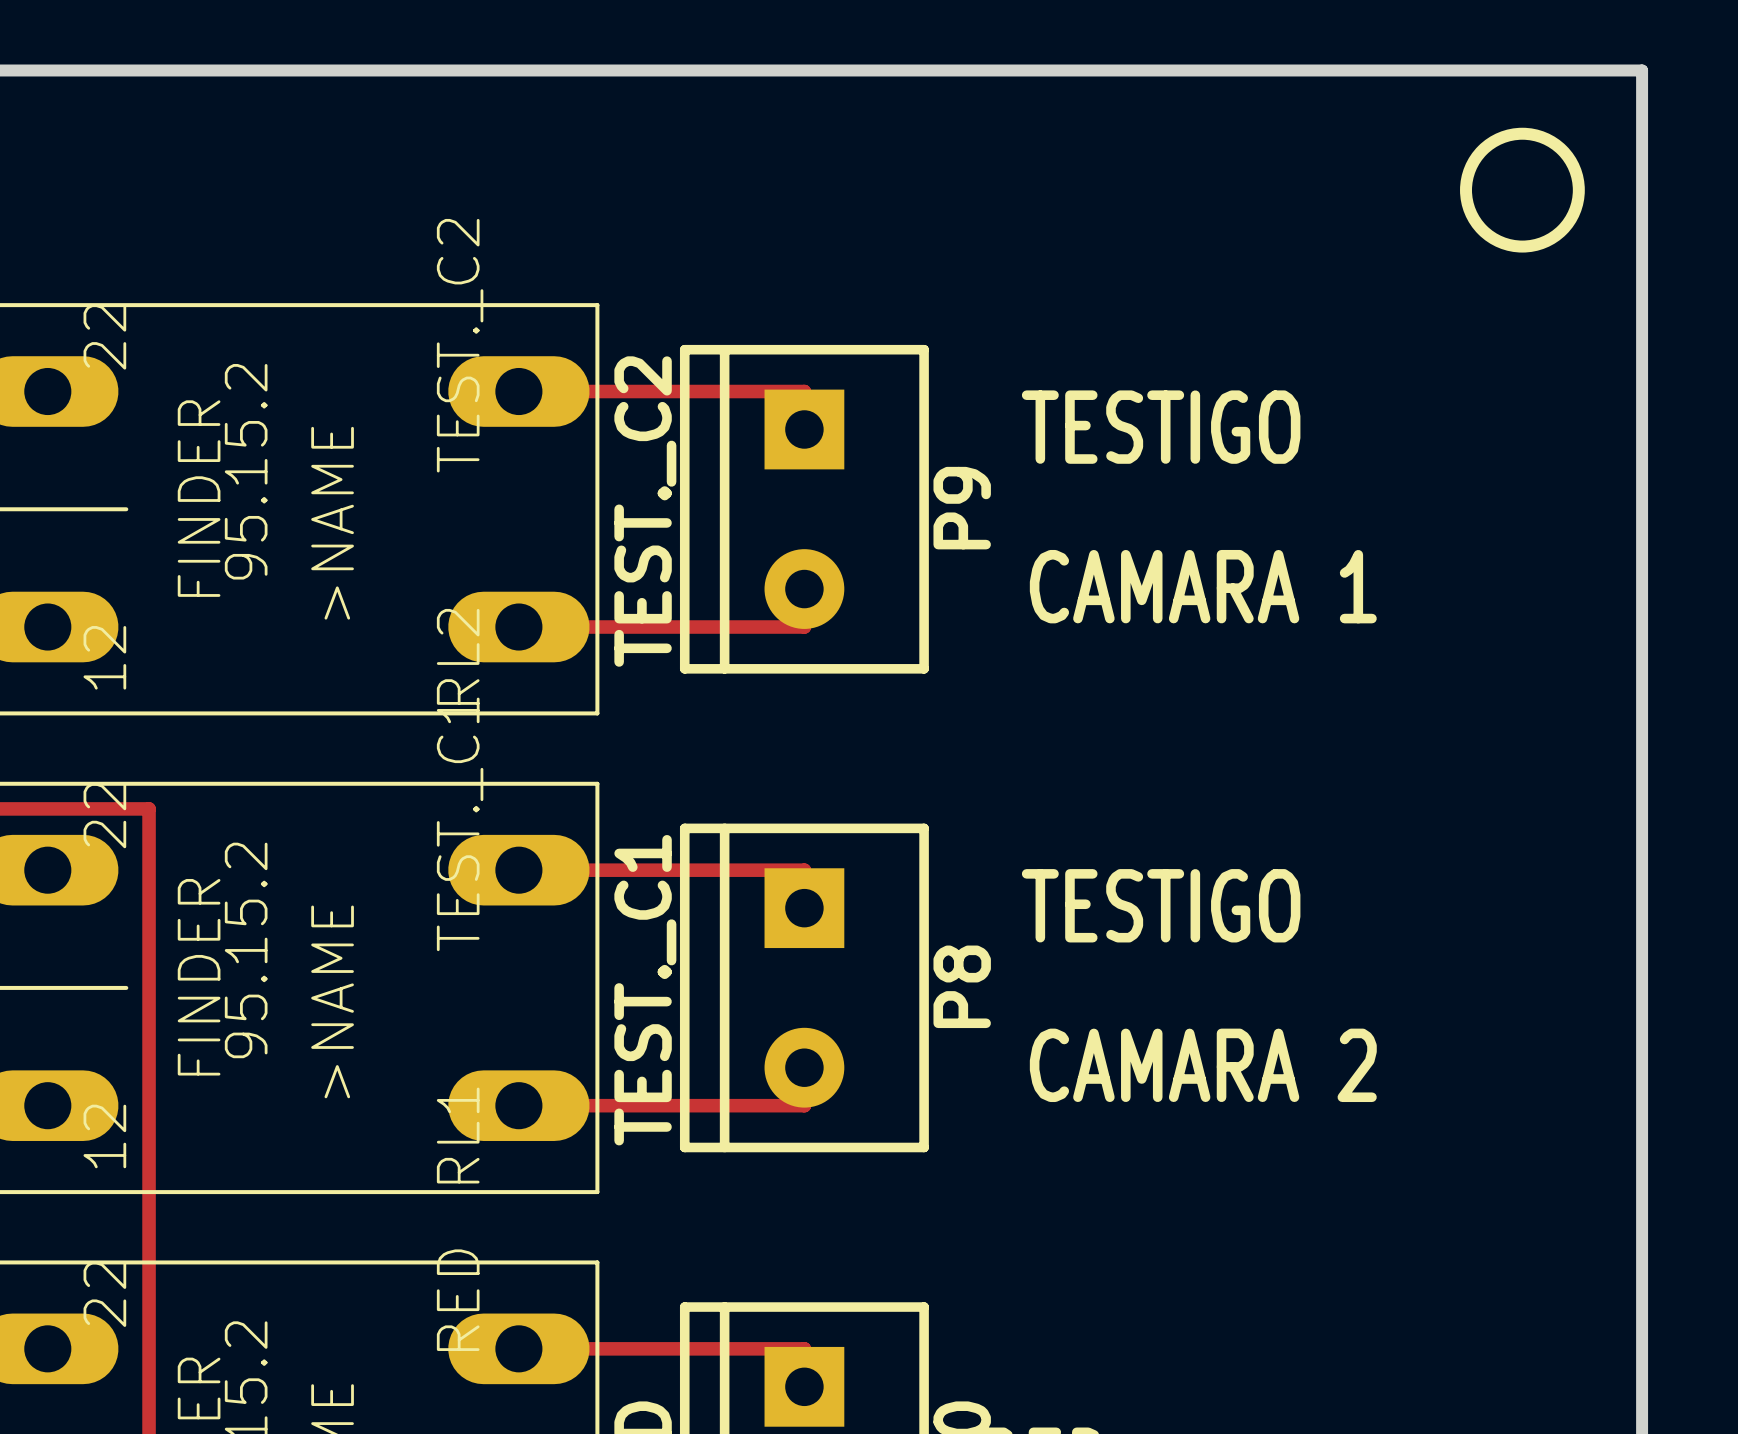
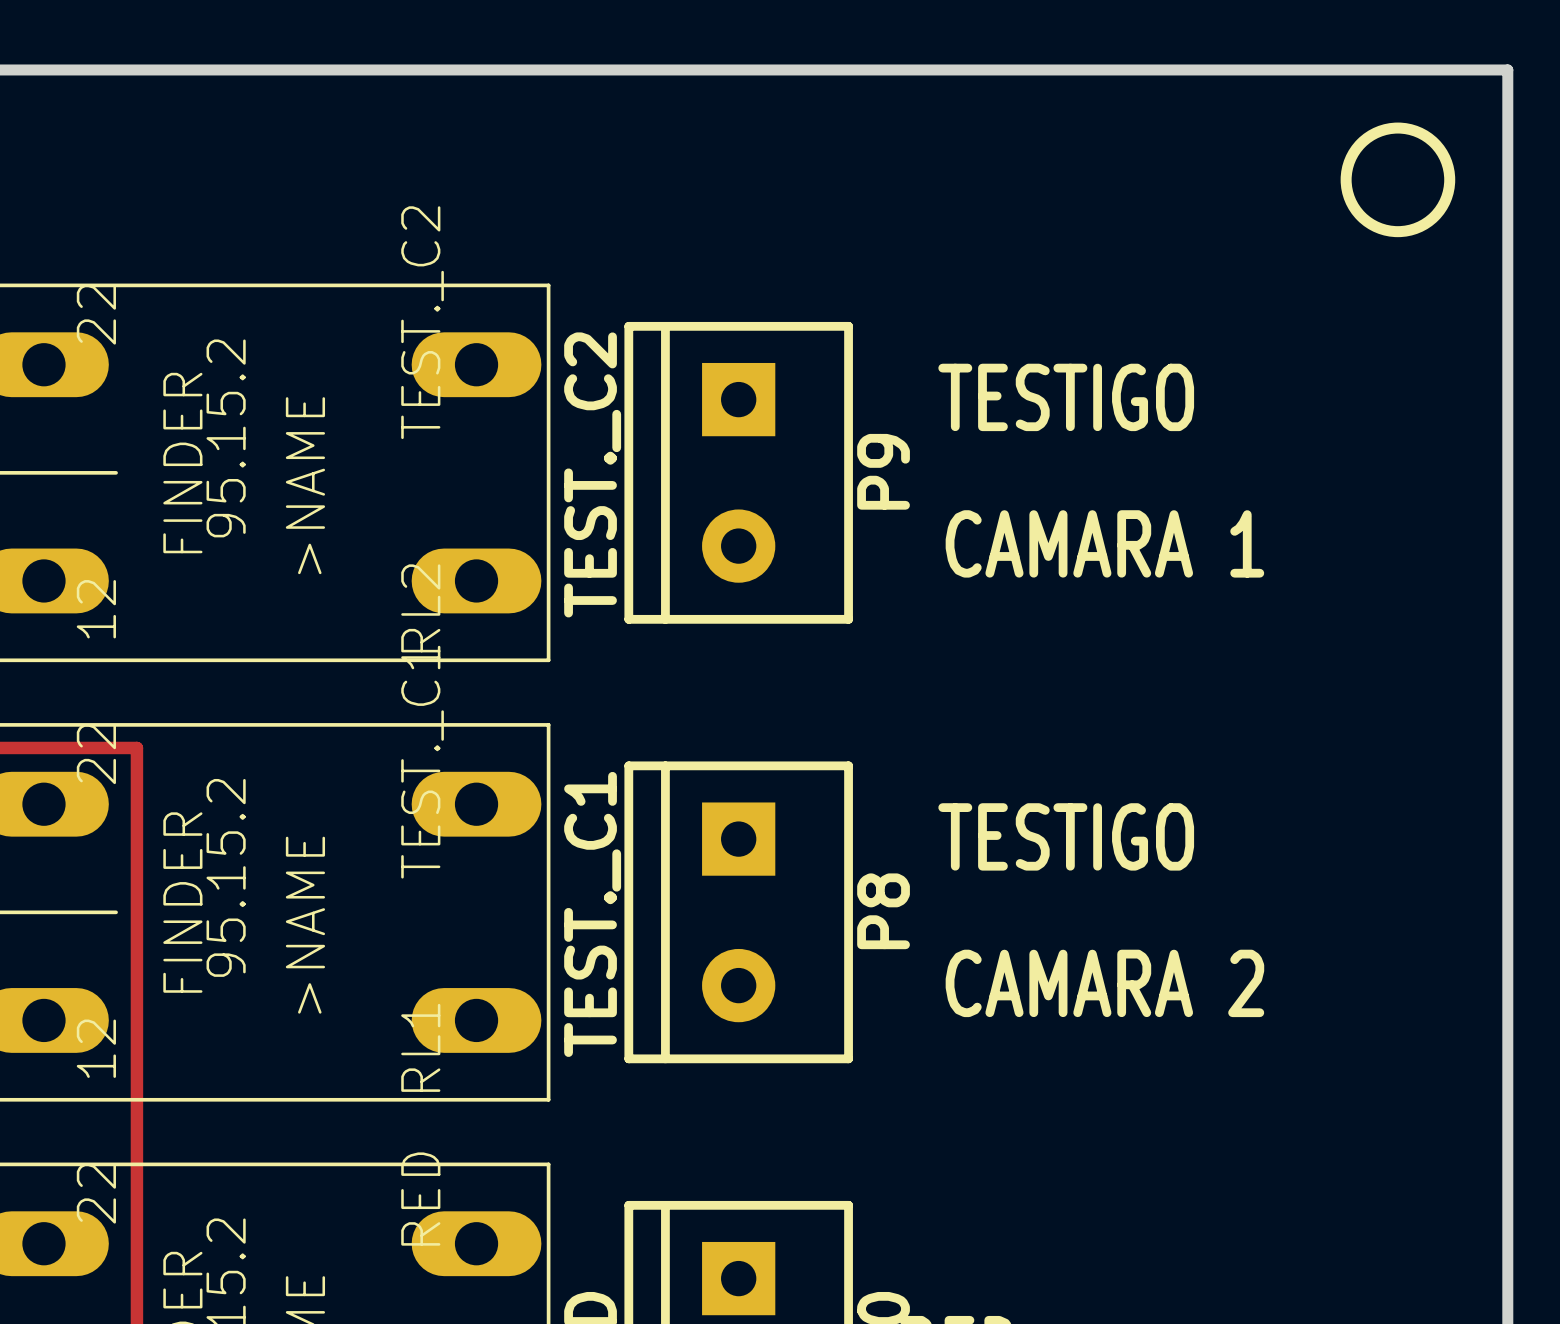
top track: (518, 391) (804, 391) (804, 429) -> none
top track: (804, 589) (804, 627) (518, 627) -> none
top track: (518, 870) (804, 870) (804, 908) -> none
top track: (804, 1067) (804, 1105) (518, 1105) -> none
top track: (518, 1348) (804, 1348) (804, 1386) -> none

